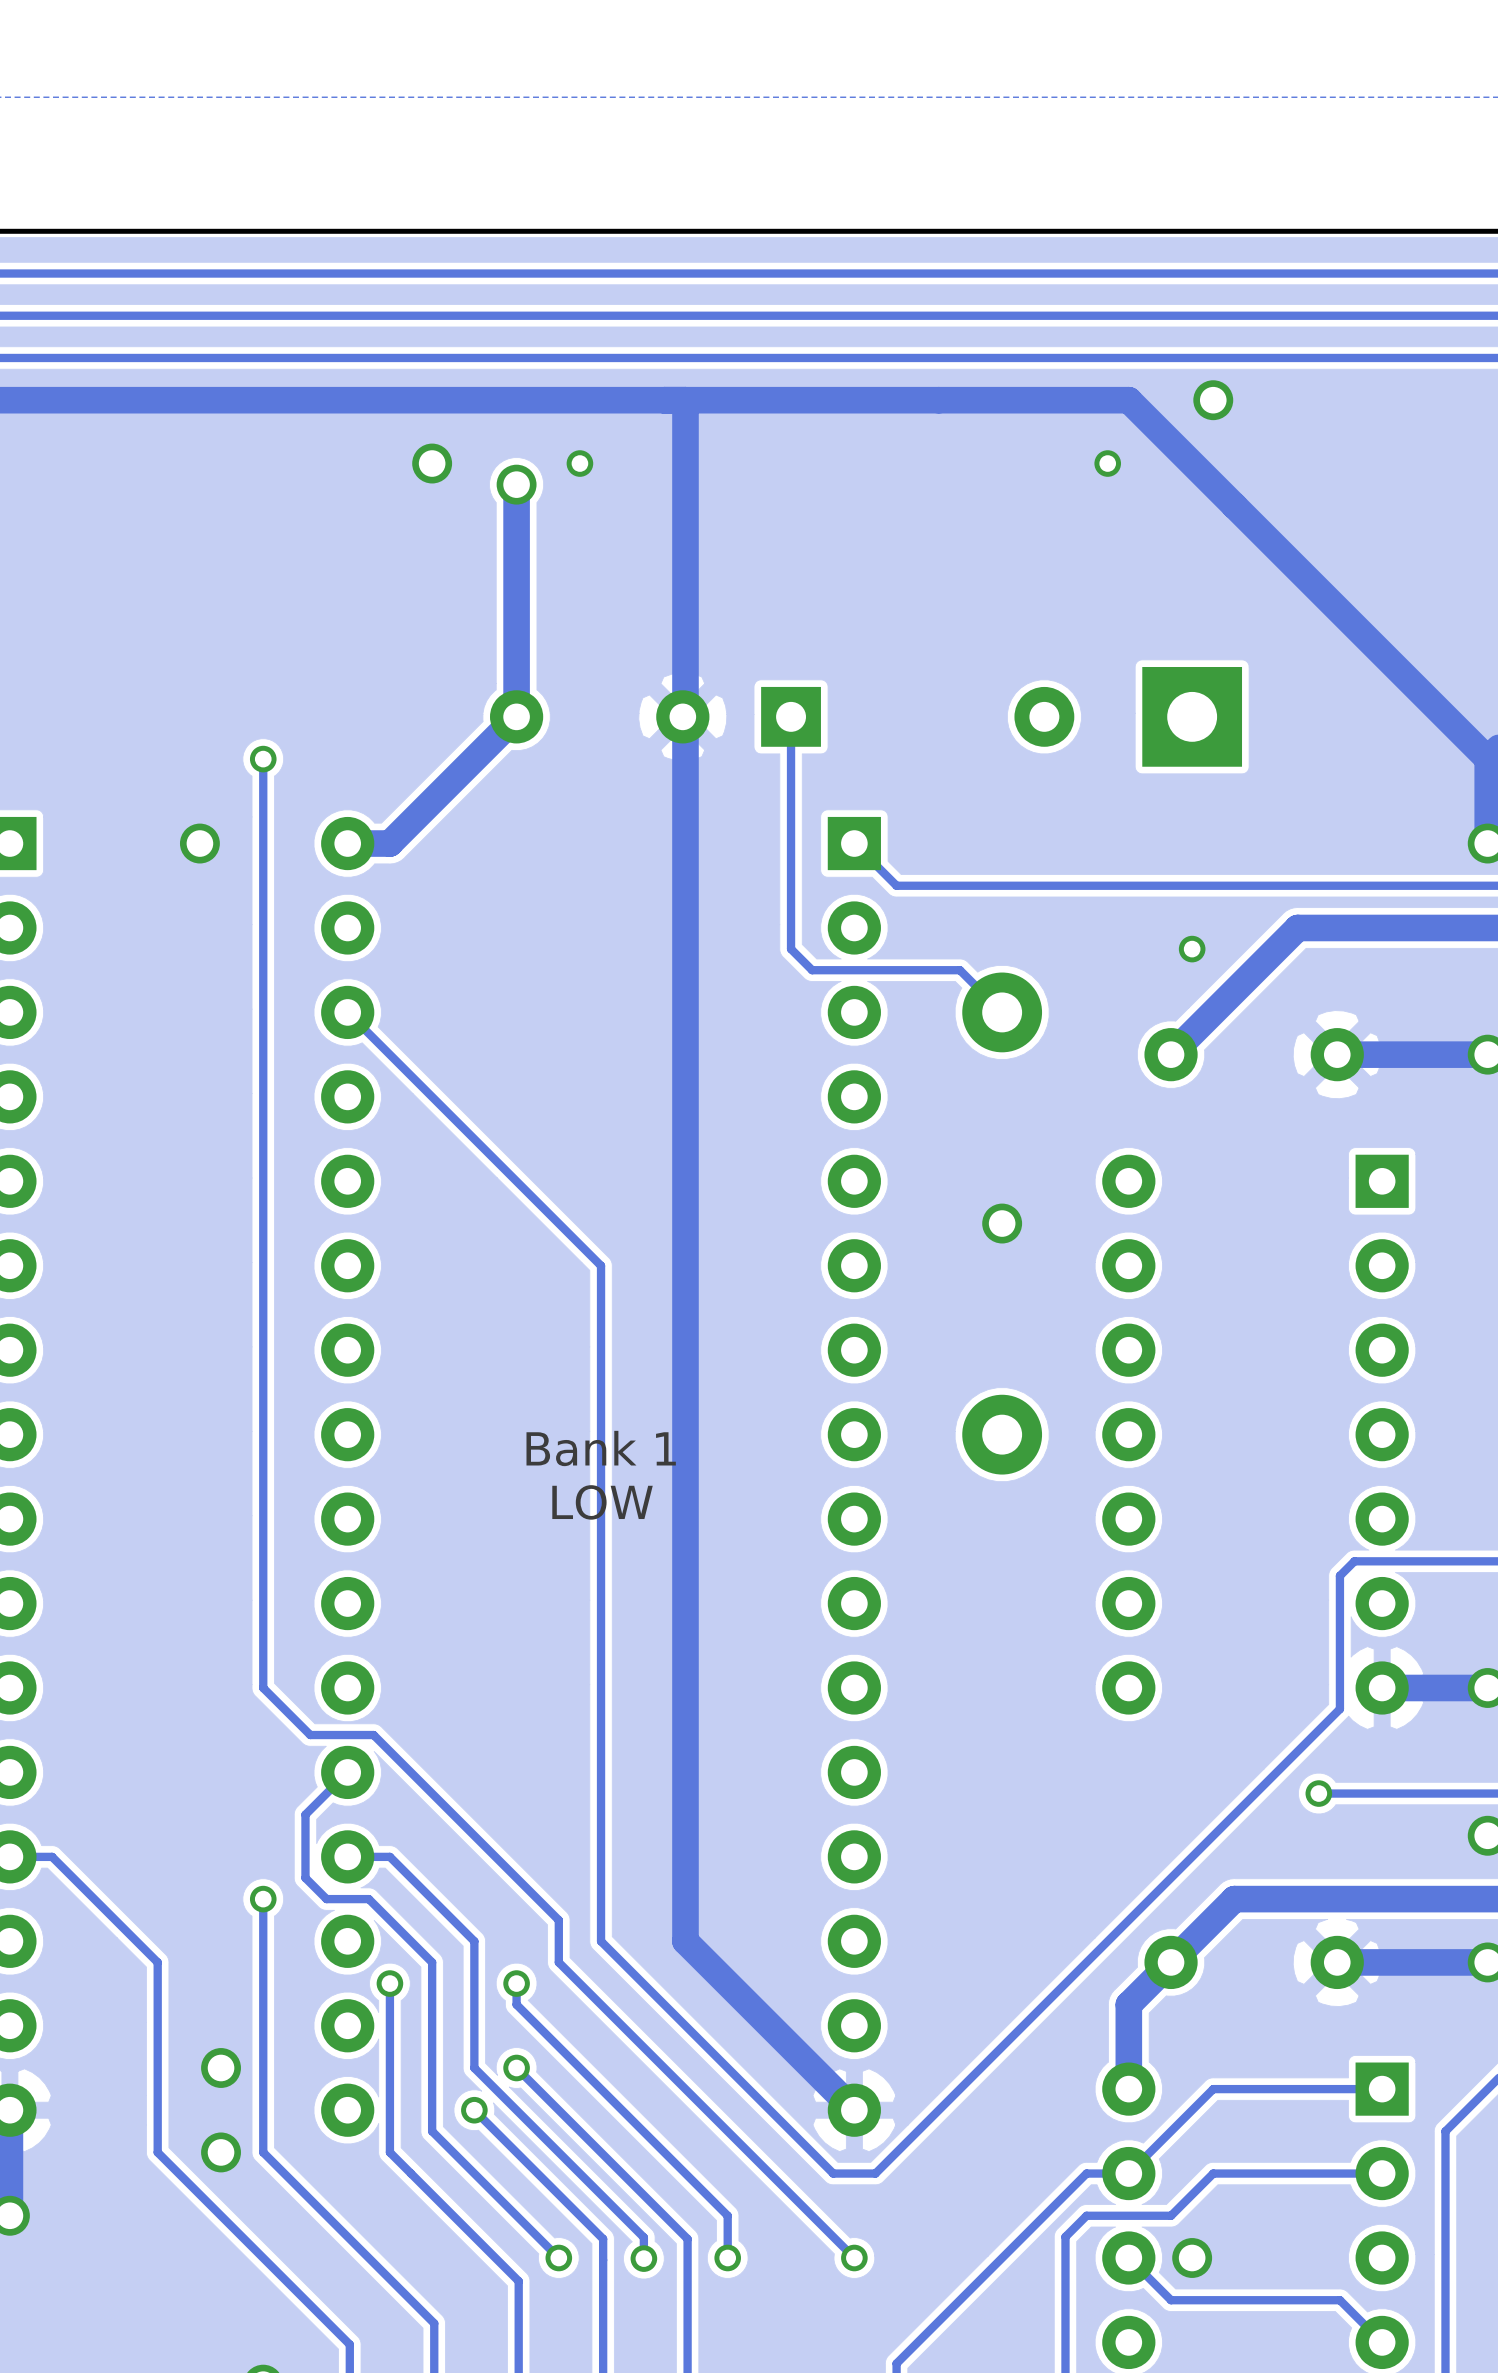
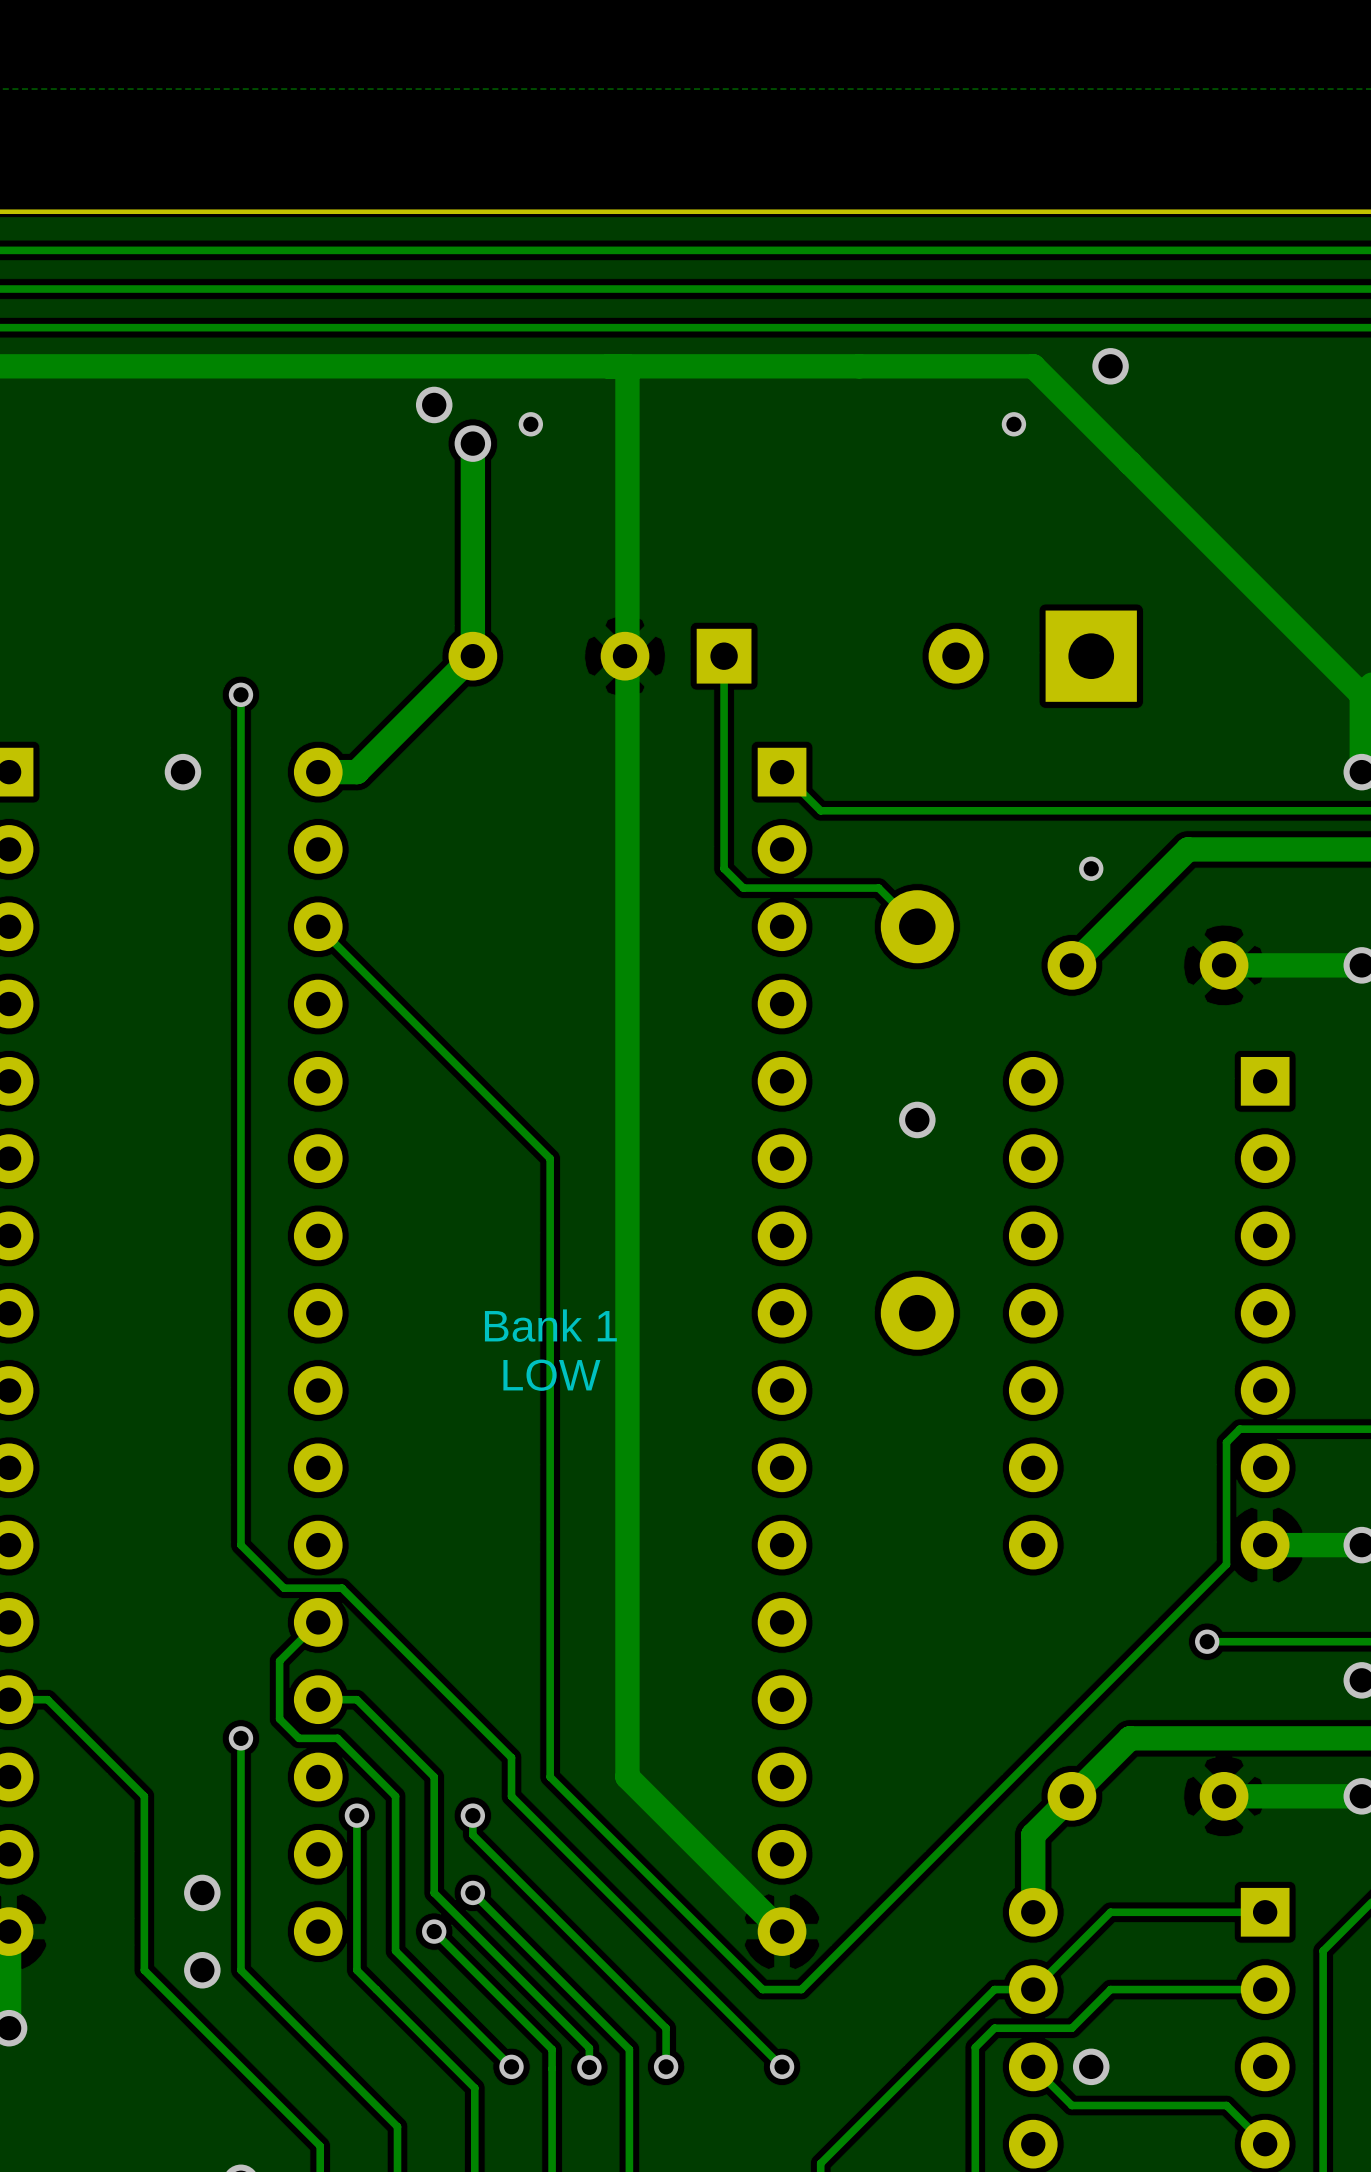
via position: (432, 463) -> (434, 404)

